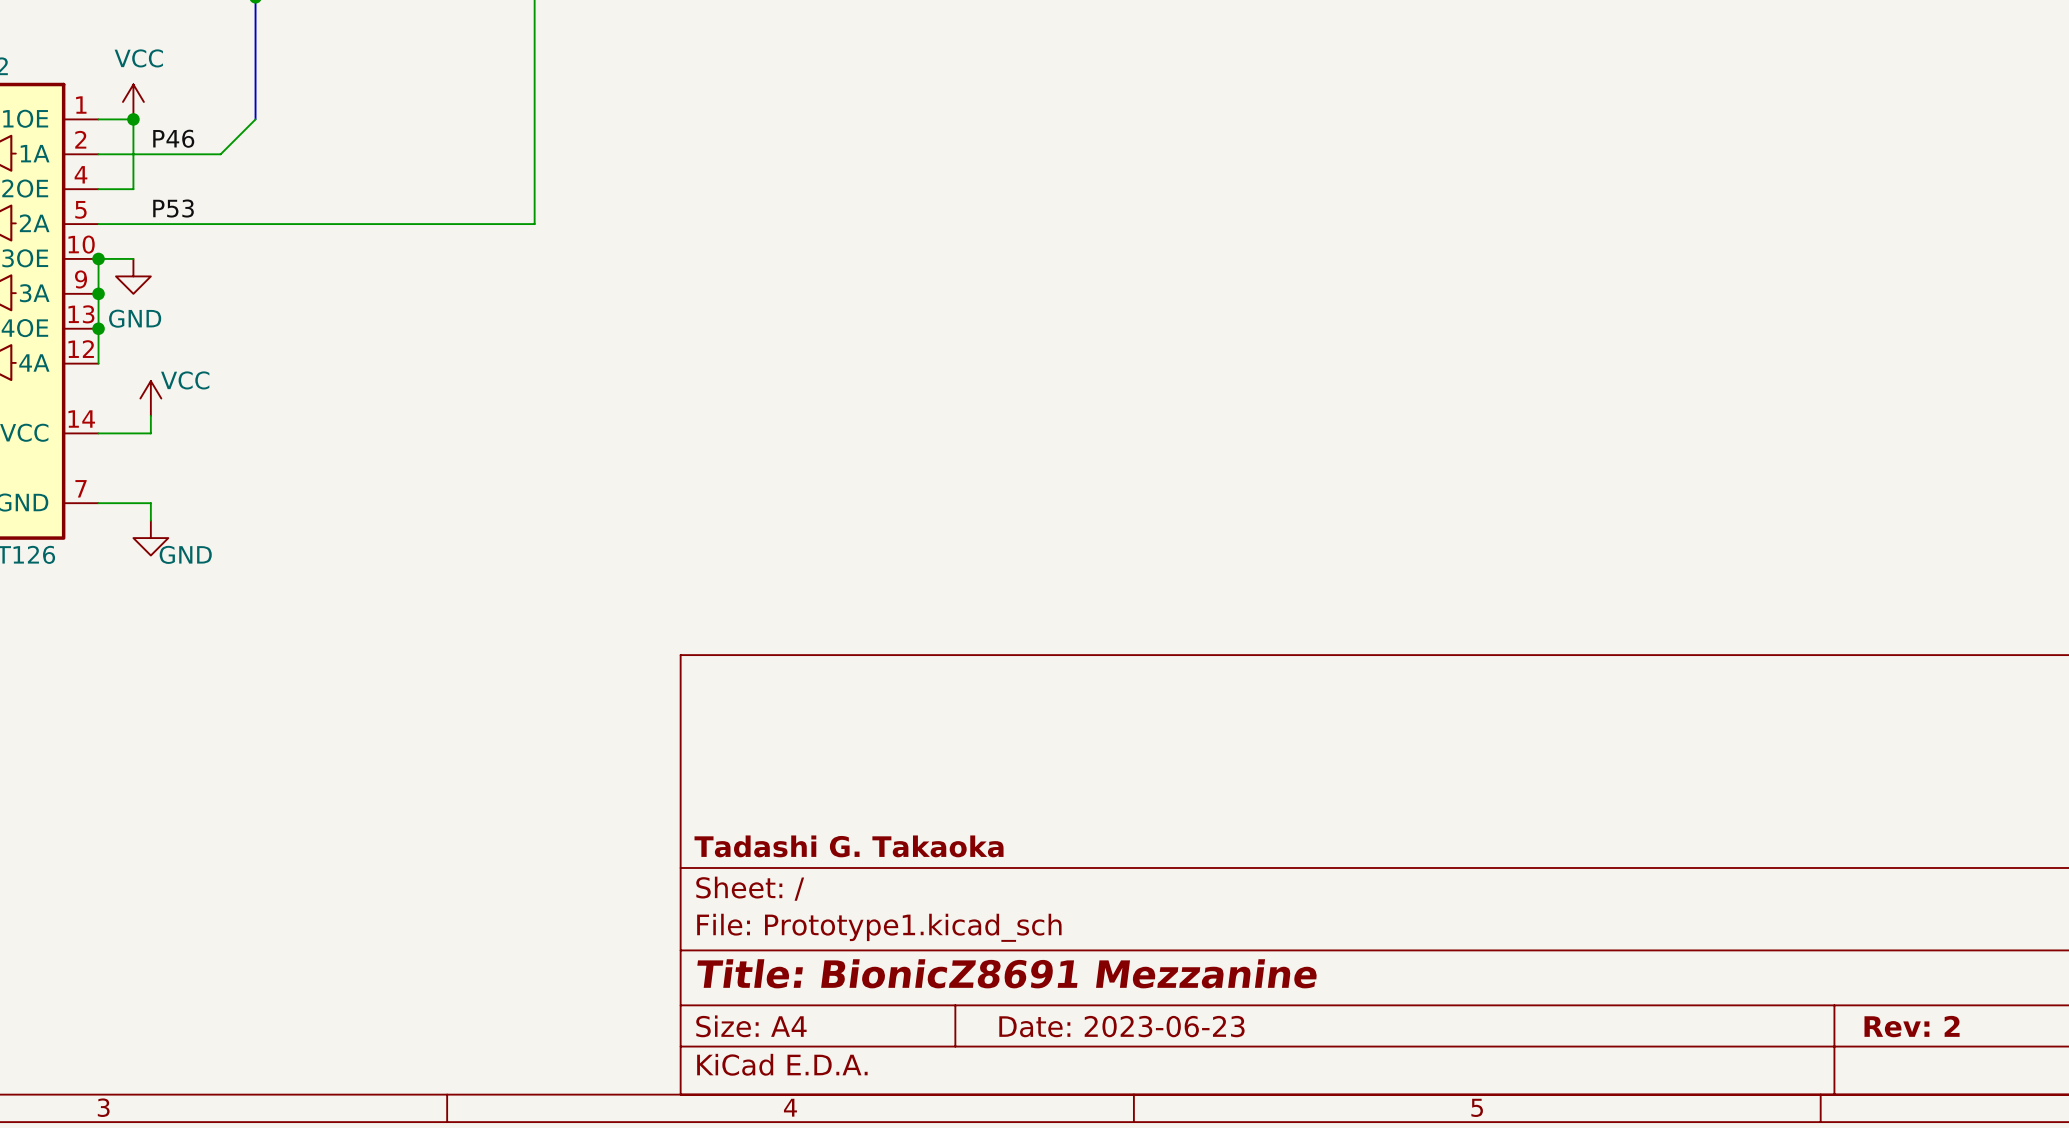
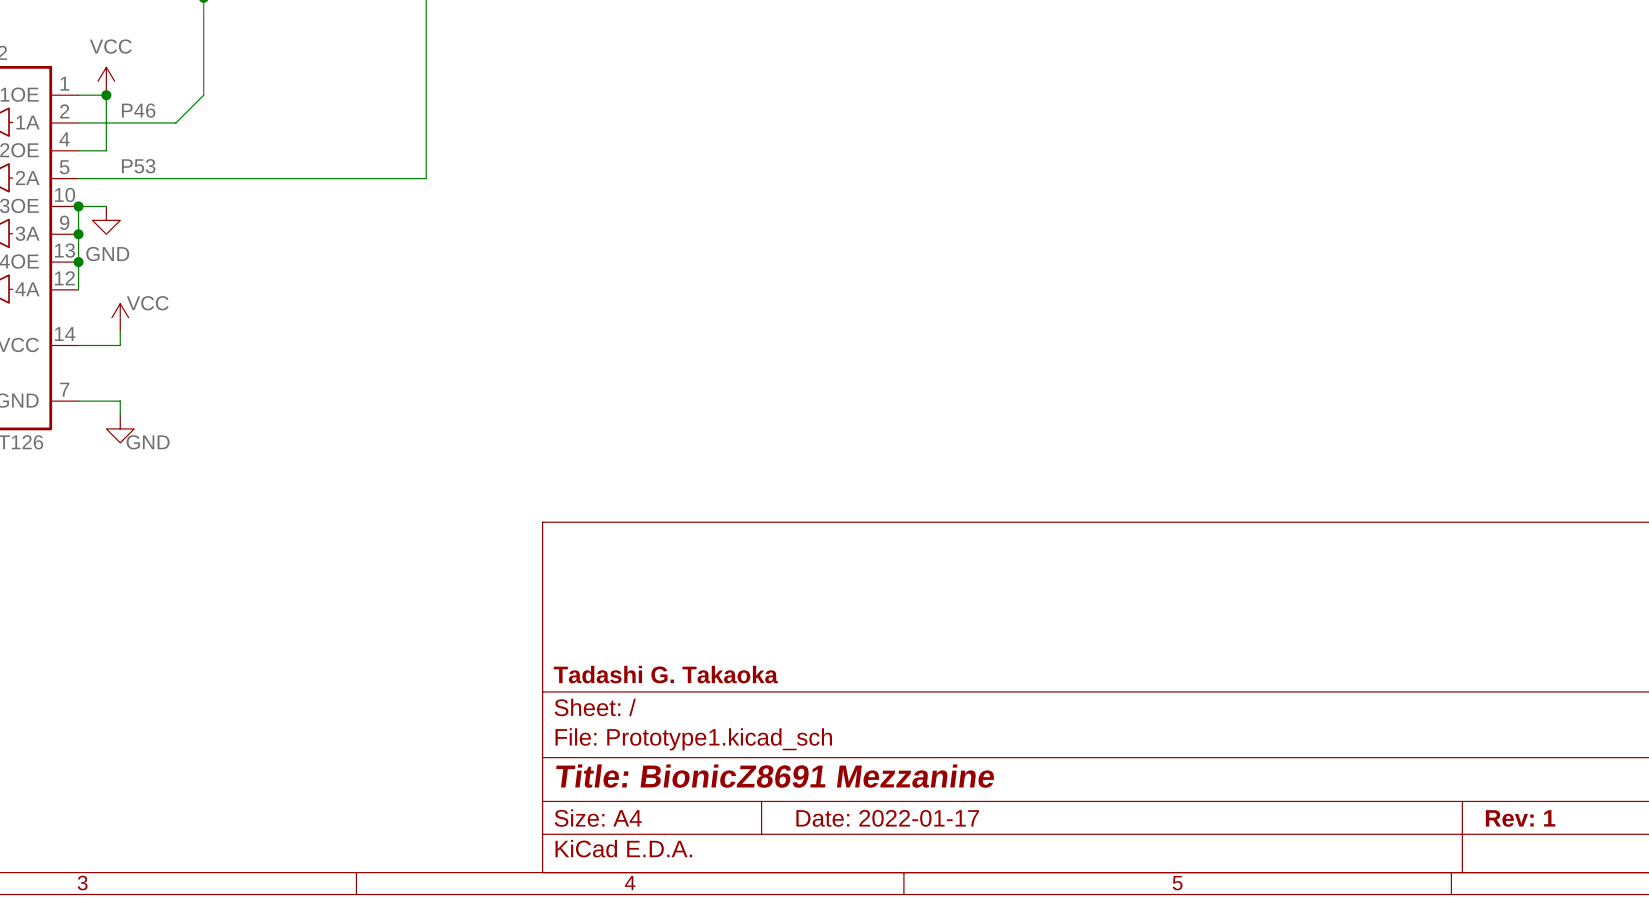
title block: Date: 2023-06-23 (1121, 1026) -> Date: 2022-01-17 (887, 818)
title block: Rev: 2 (1912, 1026) -> Rev: 1 (1520, 818)

